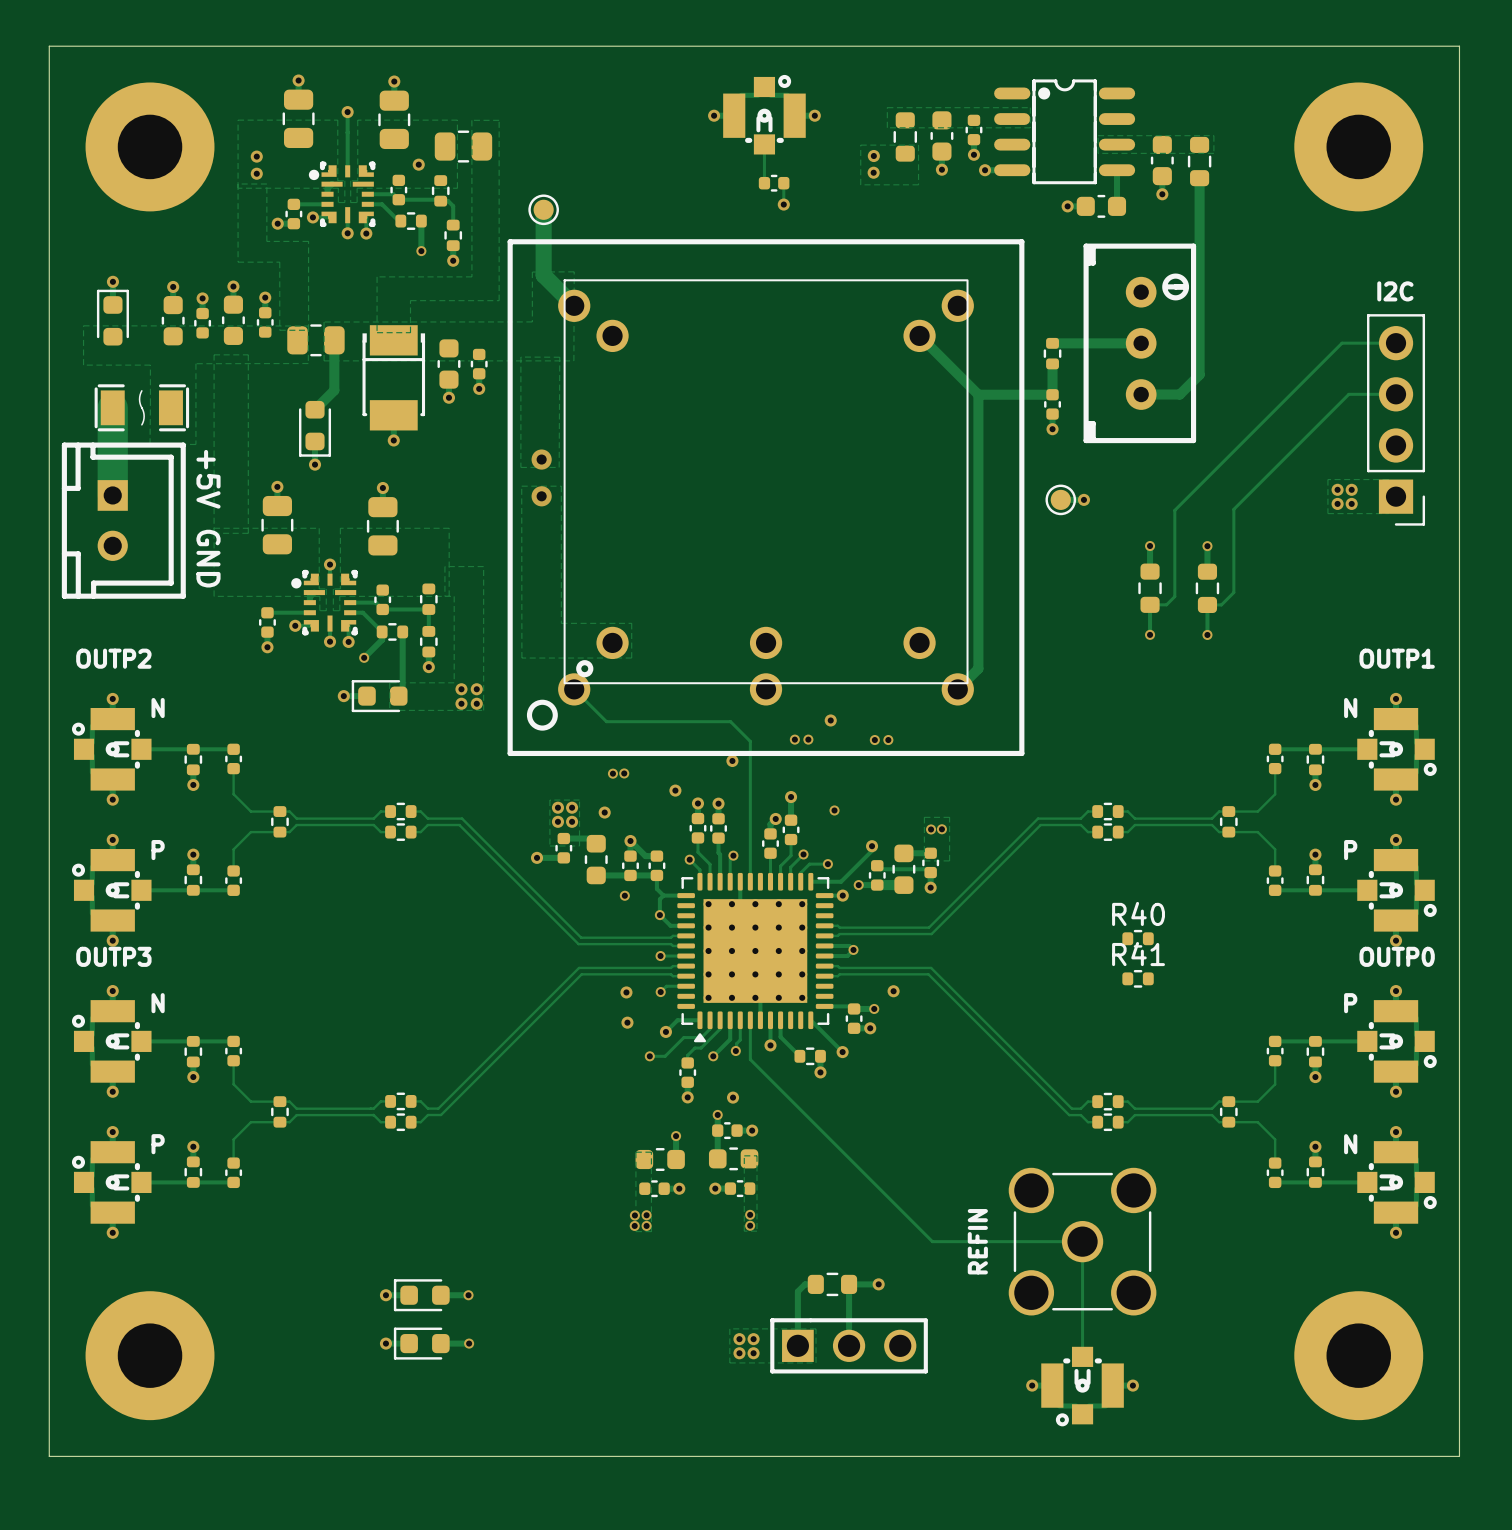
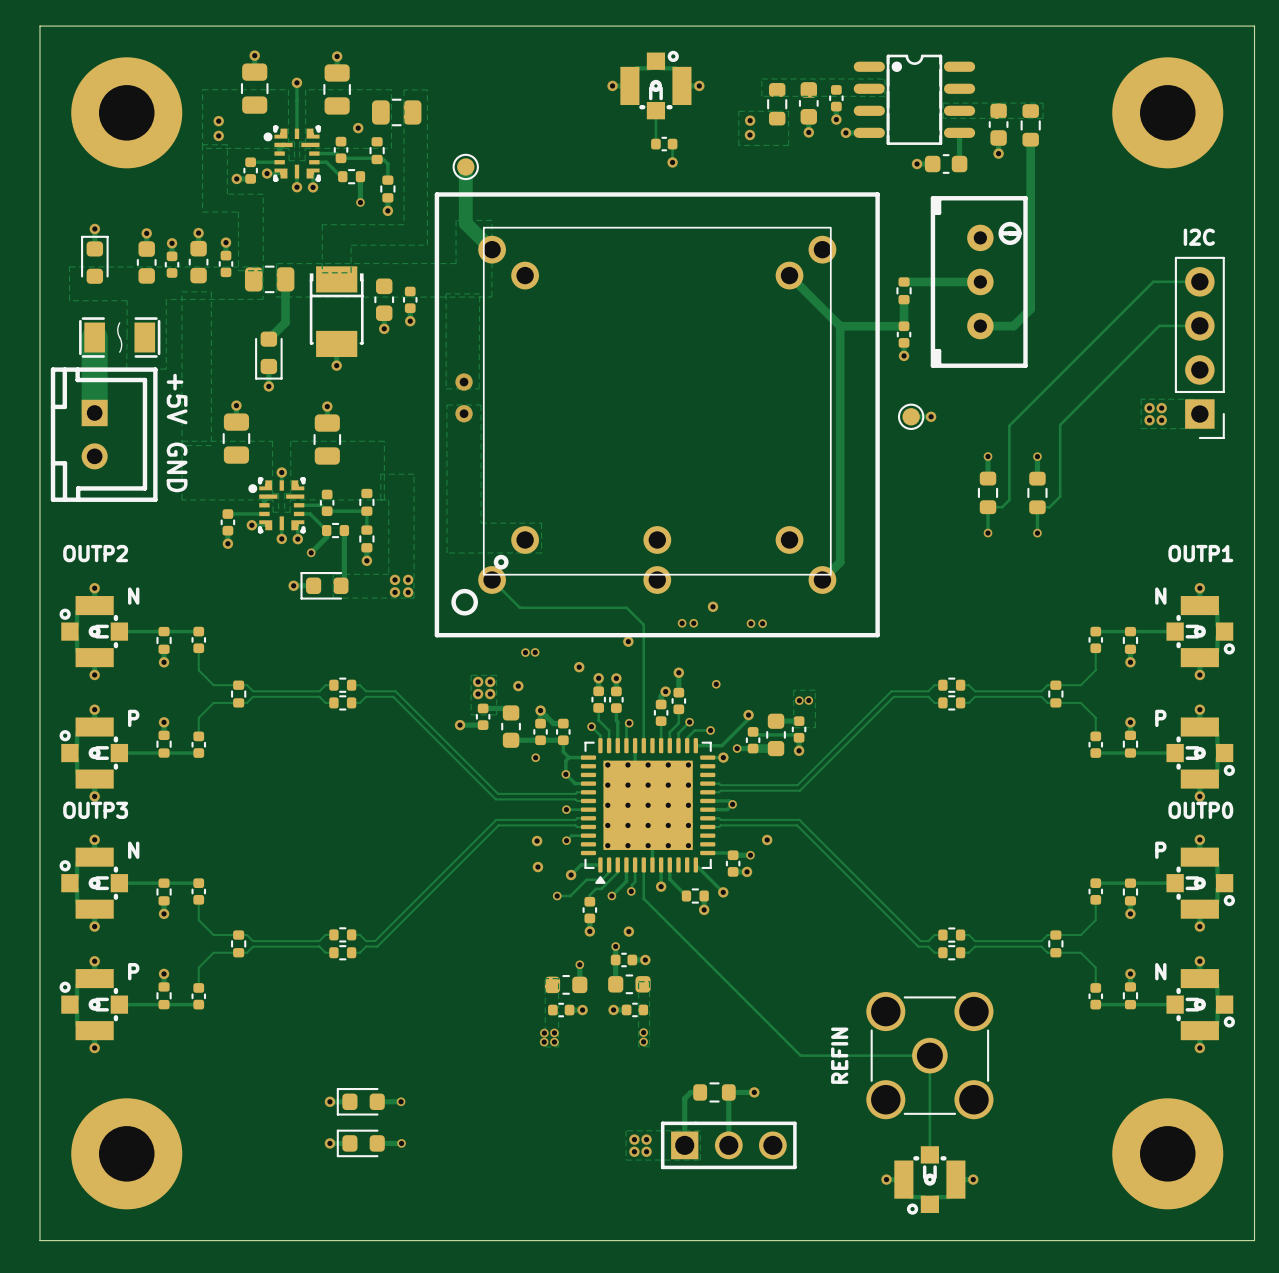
R40: (1138, 938) -> none
R41: (1138, 978) -> none

